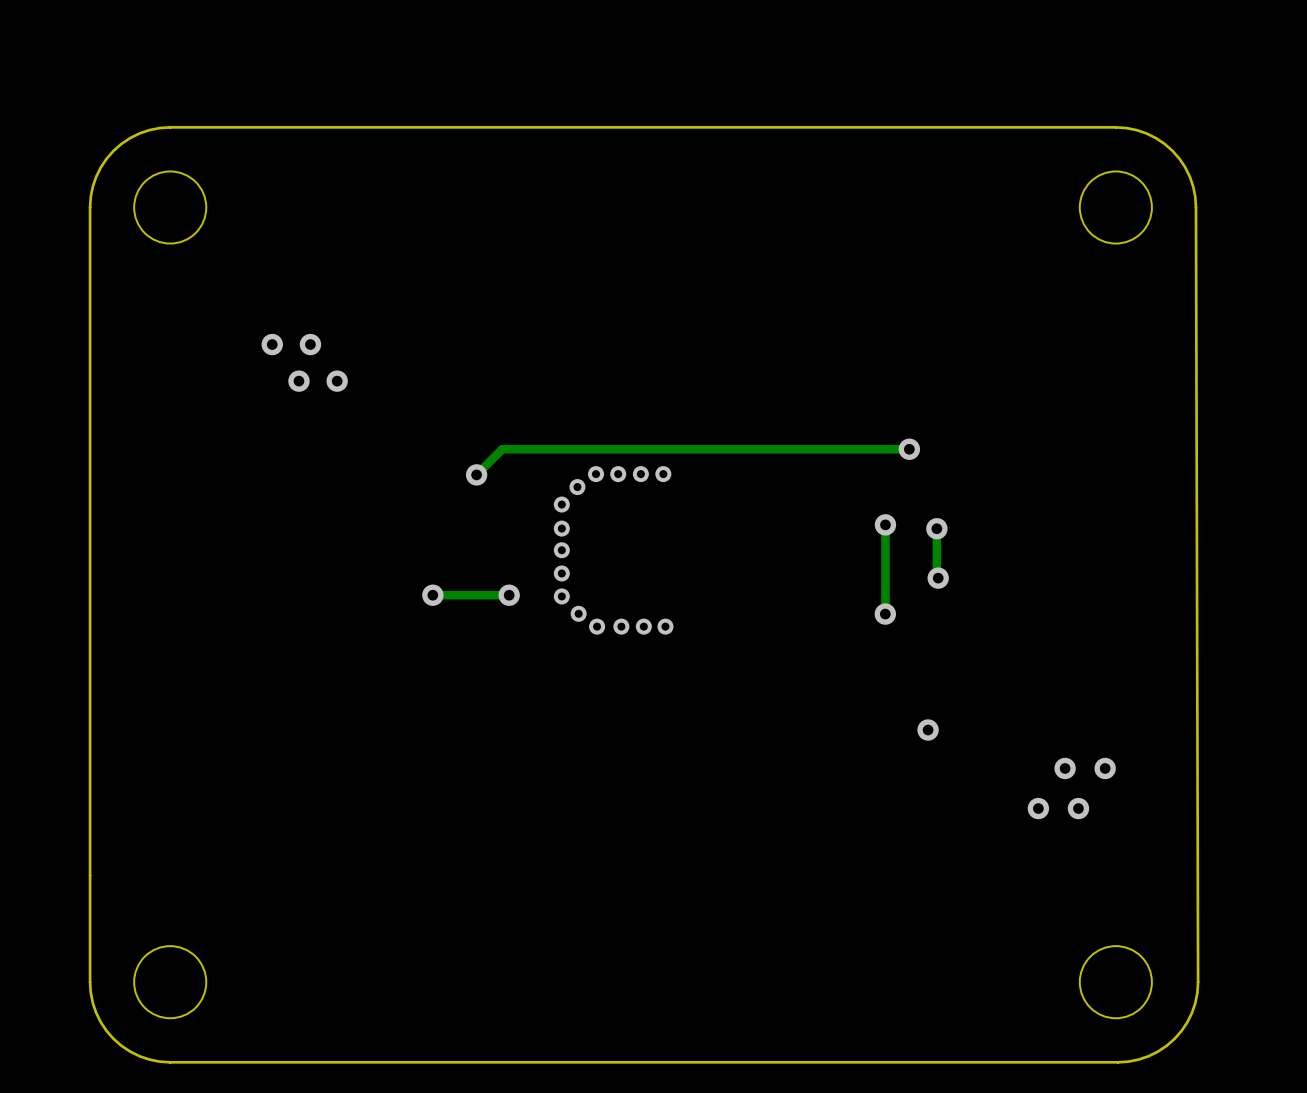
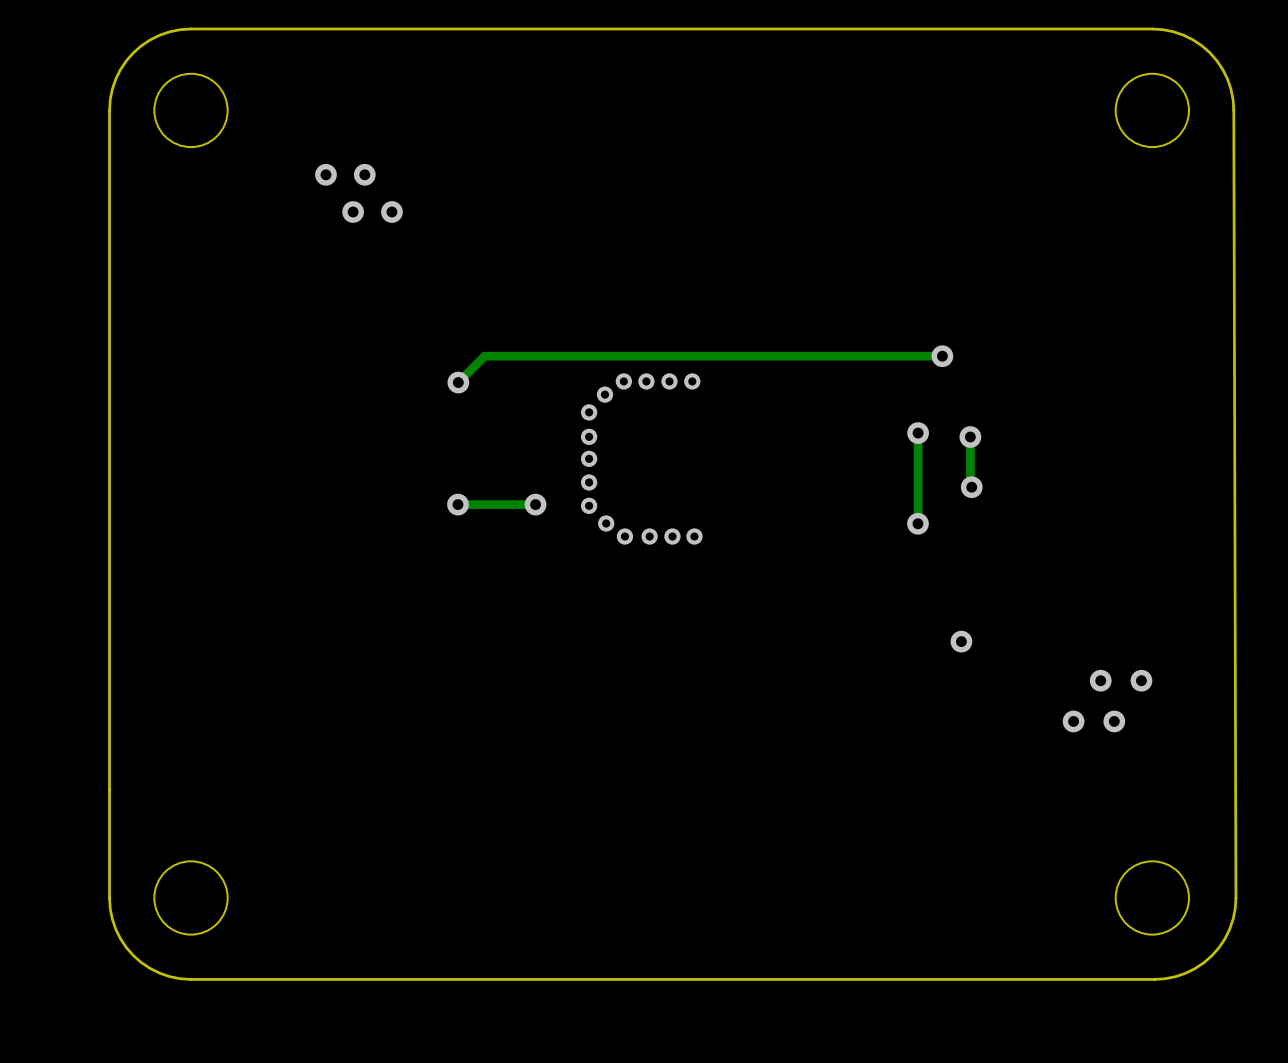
via: none -> (325, 174)
via: none -> (364, 174)
via: none -> (353, 212)
via: none -> (391, 212)
via: (272, 344) -> none
via: (310, 344) -> none
via: (298, 381) -> none
via: (337, 381) -> none
track: (502, 449) (476, 474) -> (528, 356) (484, 356) (458, 382)
via position: (476, 474) -> (458, 382)

